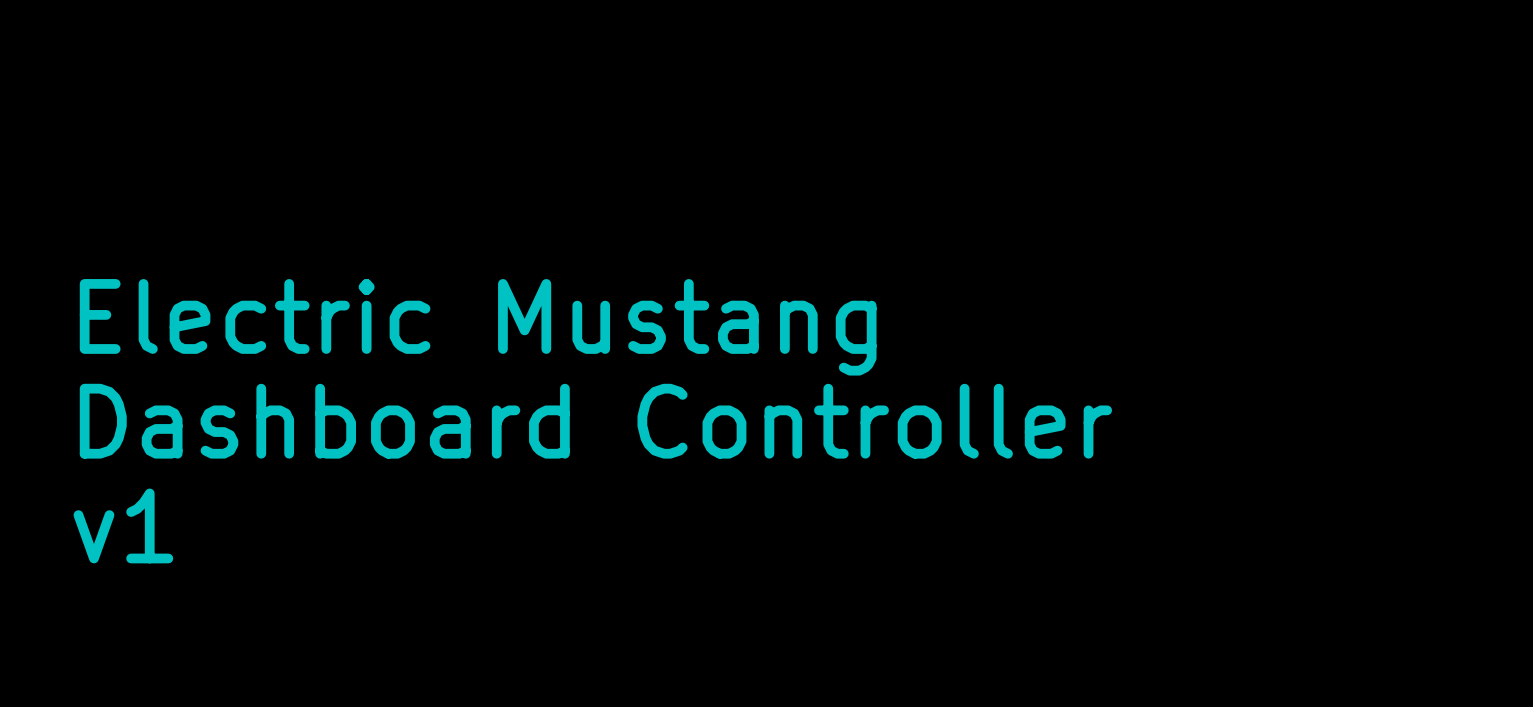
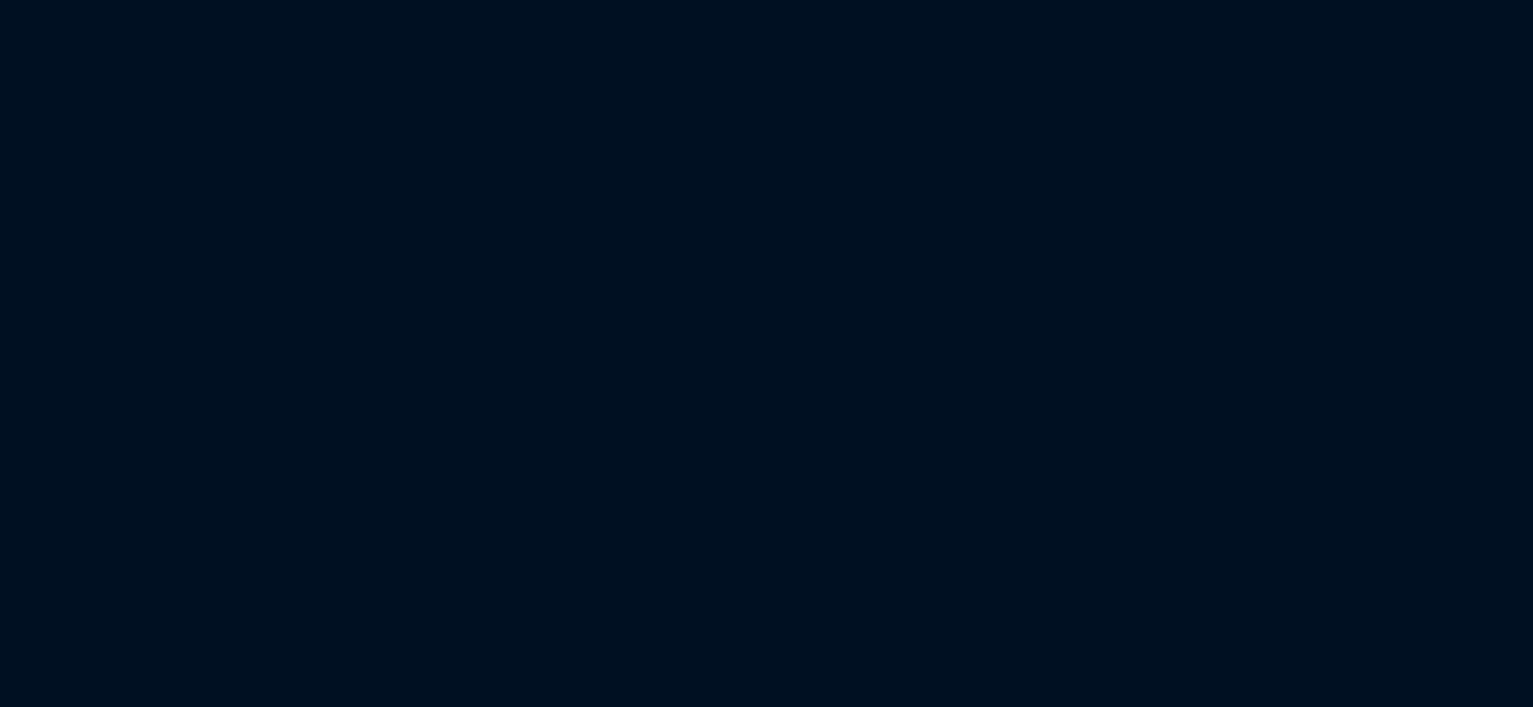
text: Electric Mustang (478, 327) -> none
text: Dashboard Controller (595, 421) -> none
text: v1 (123, 525) -> none

